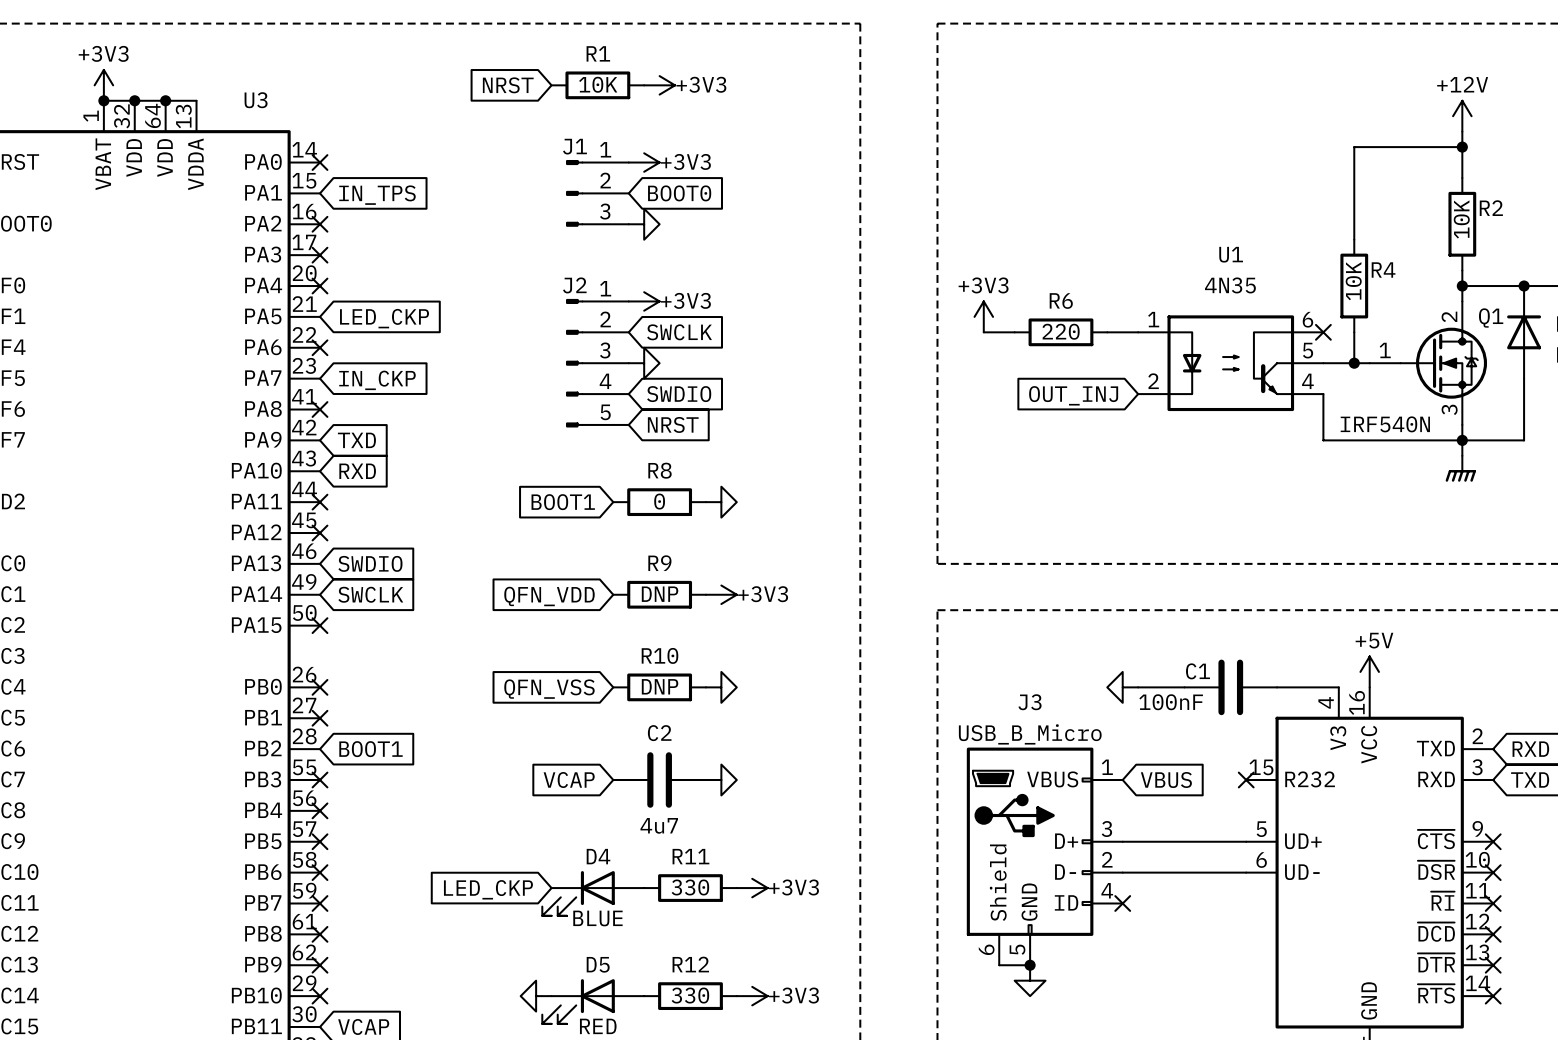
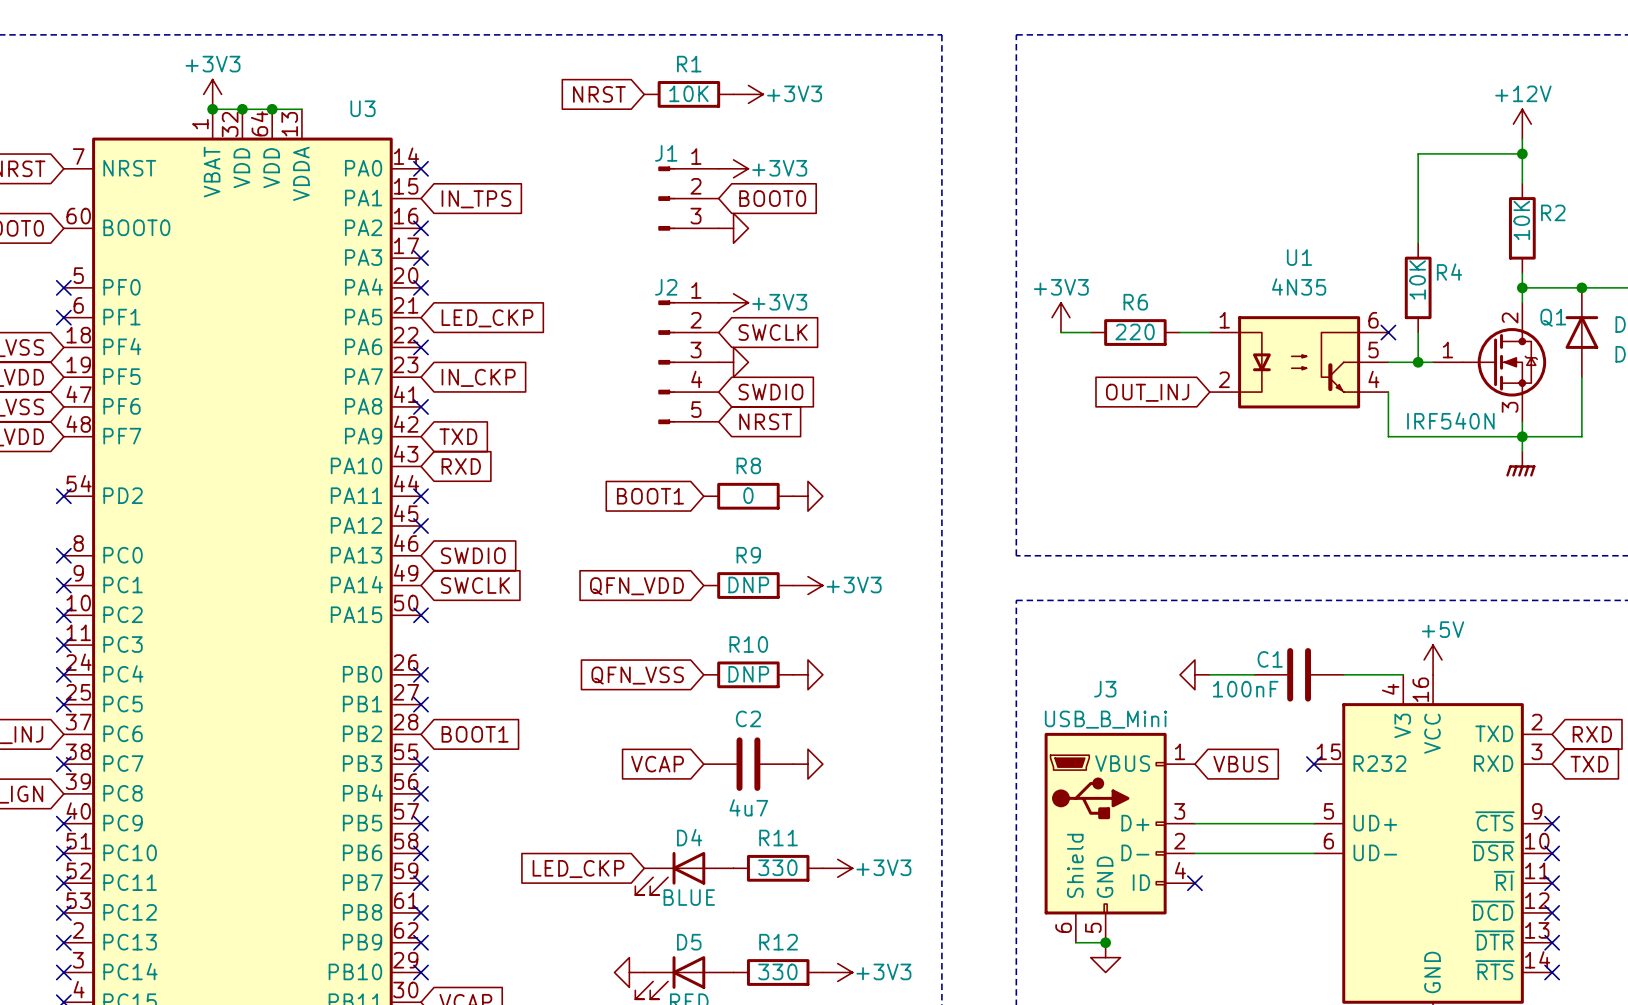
J3 value: USB_B_Micro (1030, 734) -> USB_B_Mini (1105, 719)

